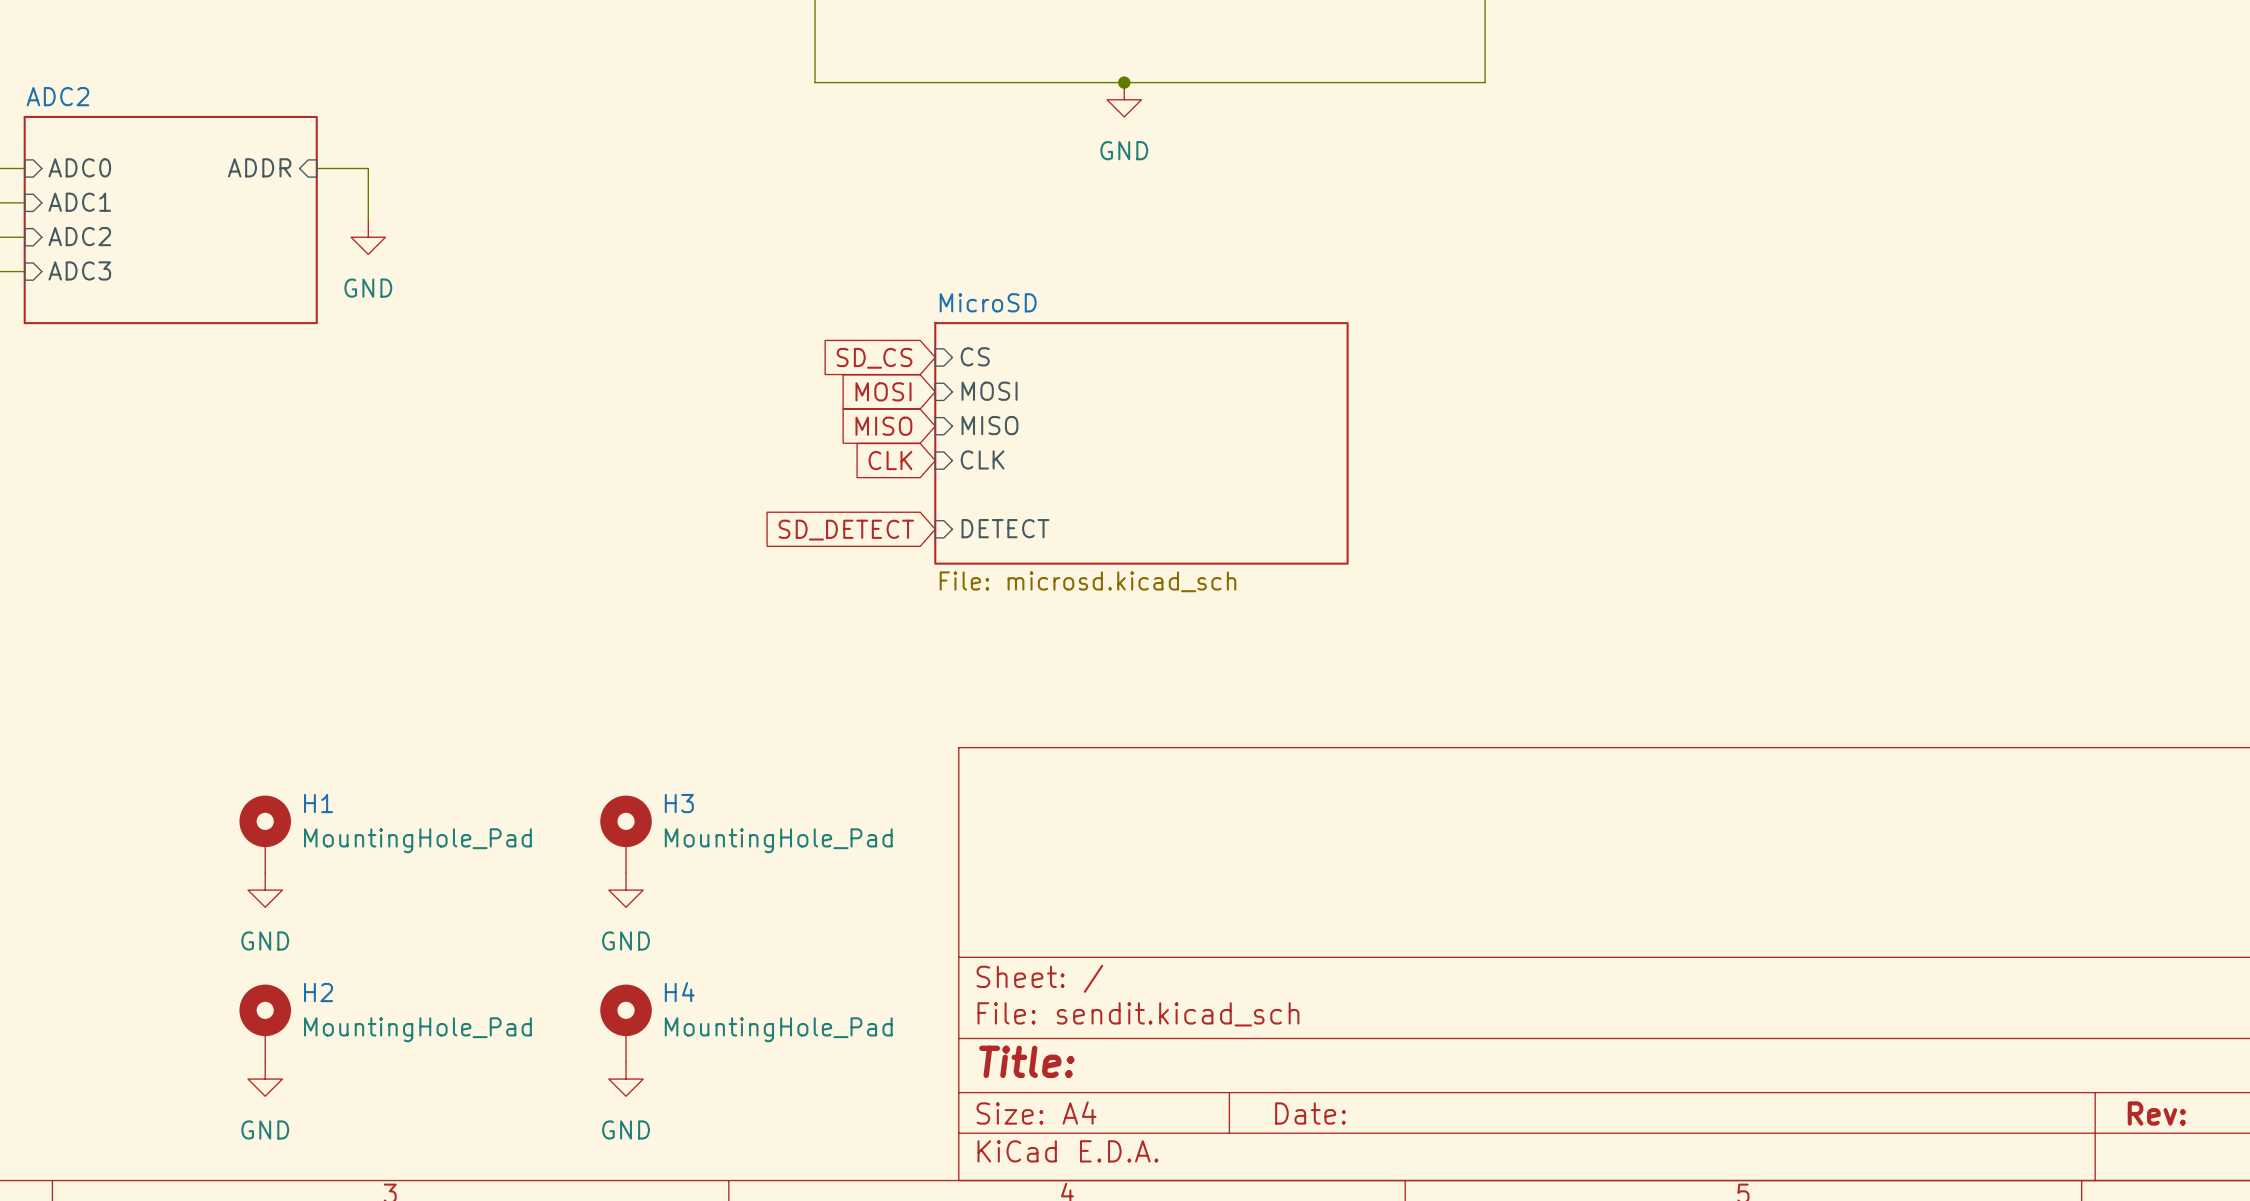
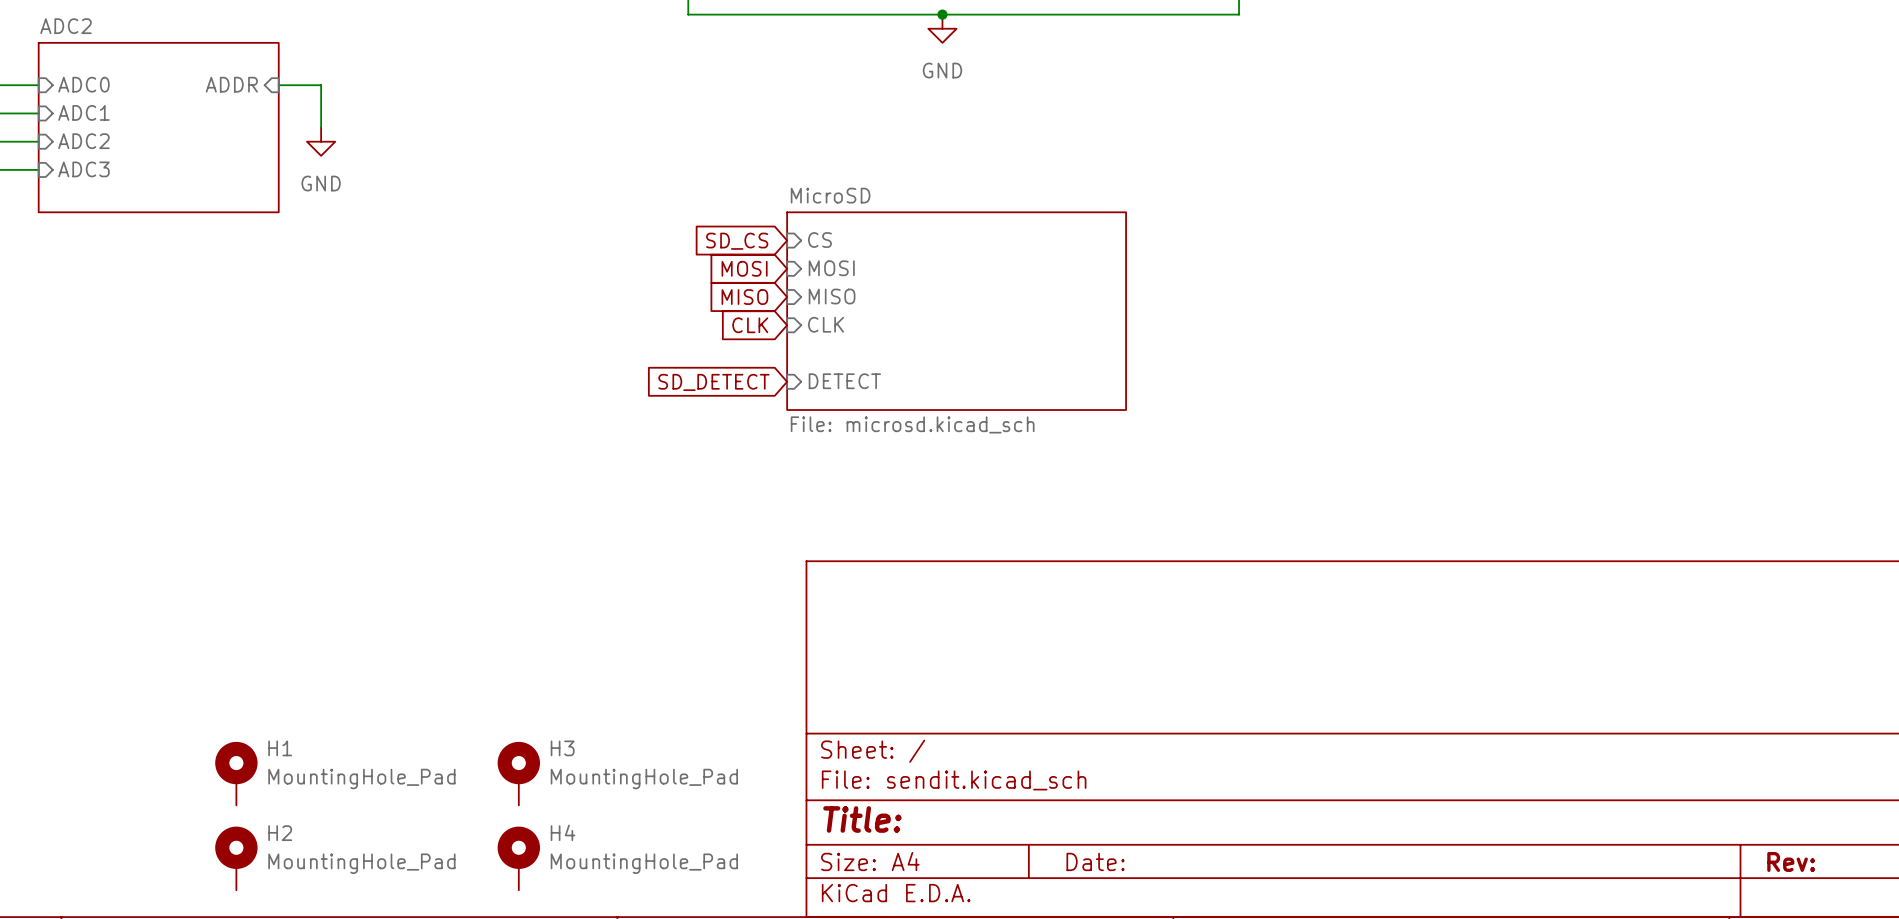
H1 position: (265, 834) -> (236, 773)
H3 position: (626, 834) -> (518, 773)
power symbol: GND (265, 890) -> none
power symbol: GND (626, 890) -> none
H2 position: (265, 1023) -> (236, 858)
H4 position: (626, 1023) -> (518, 858)
power symbol: GND (265, 1079) -> none
power symbol: GND (626, 1079) -> none

